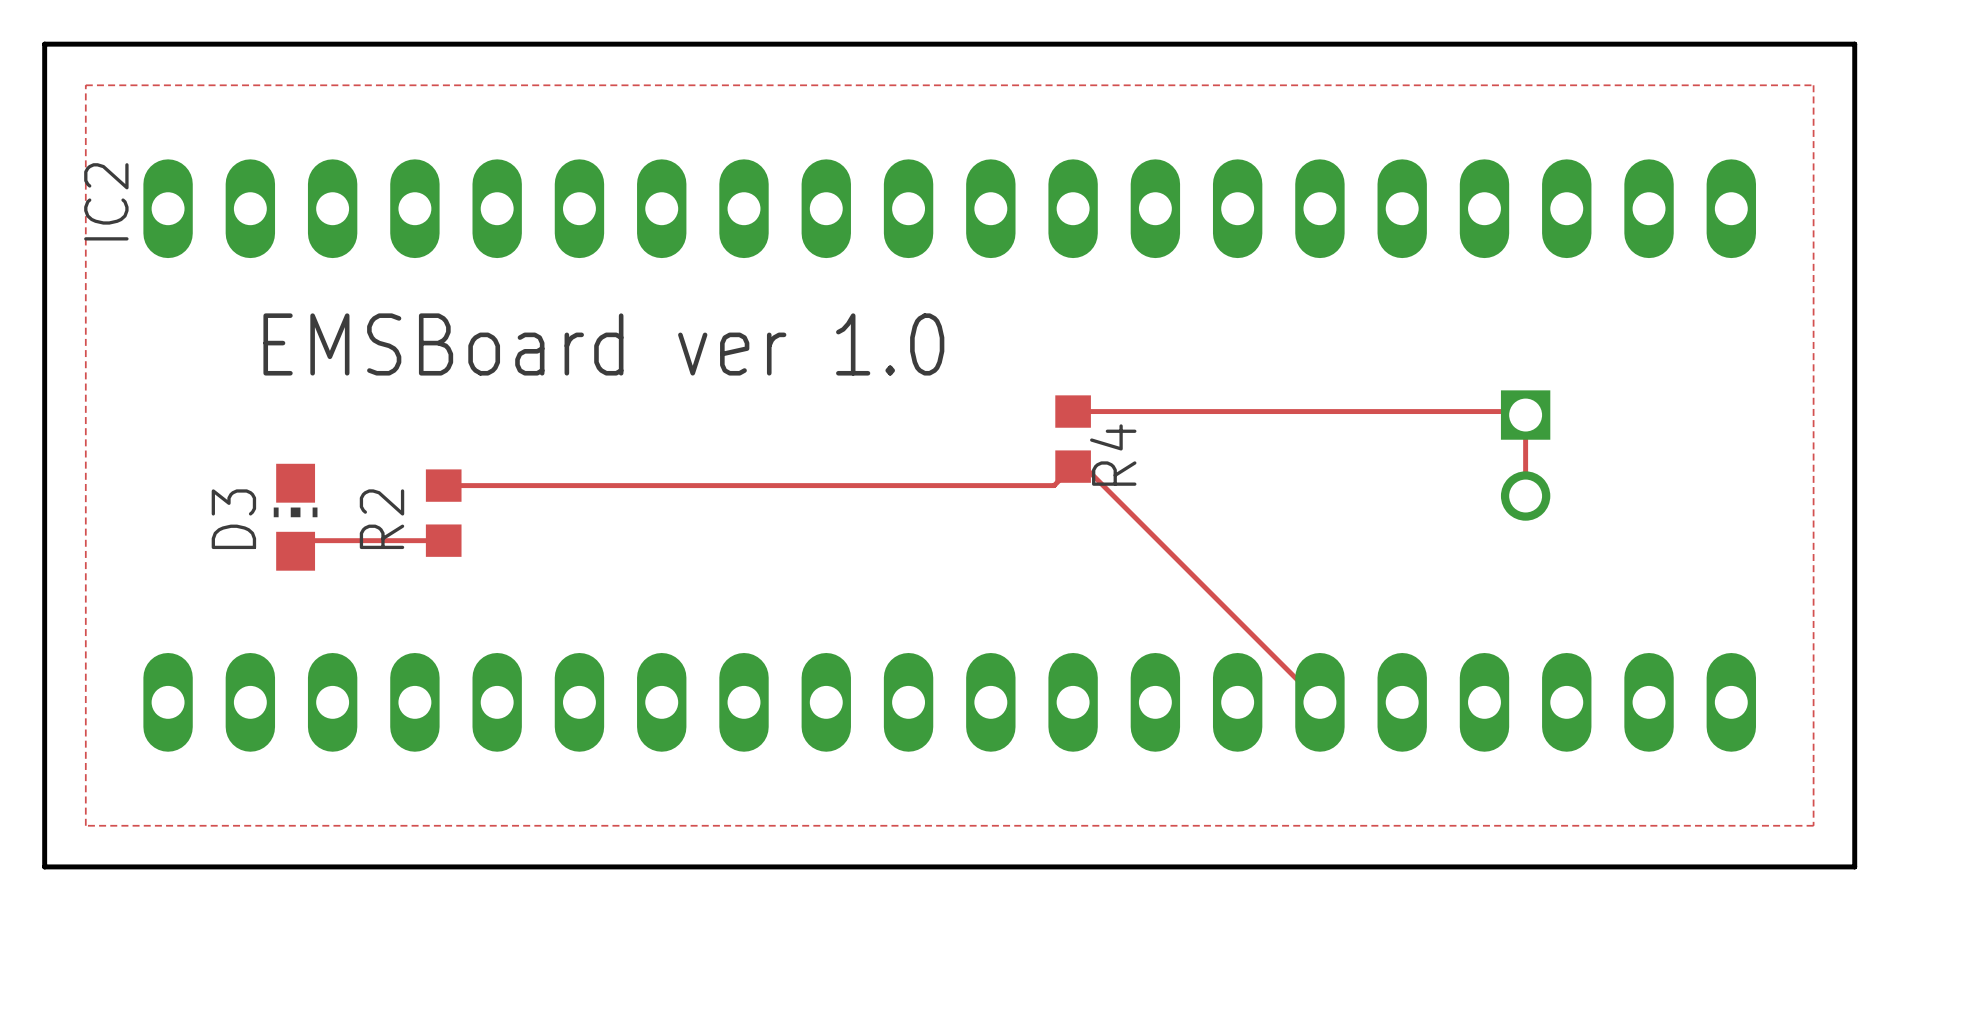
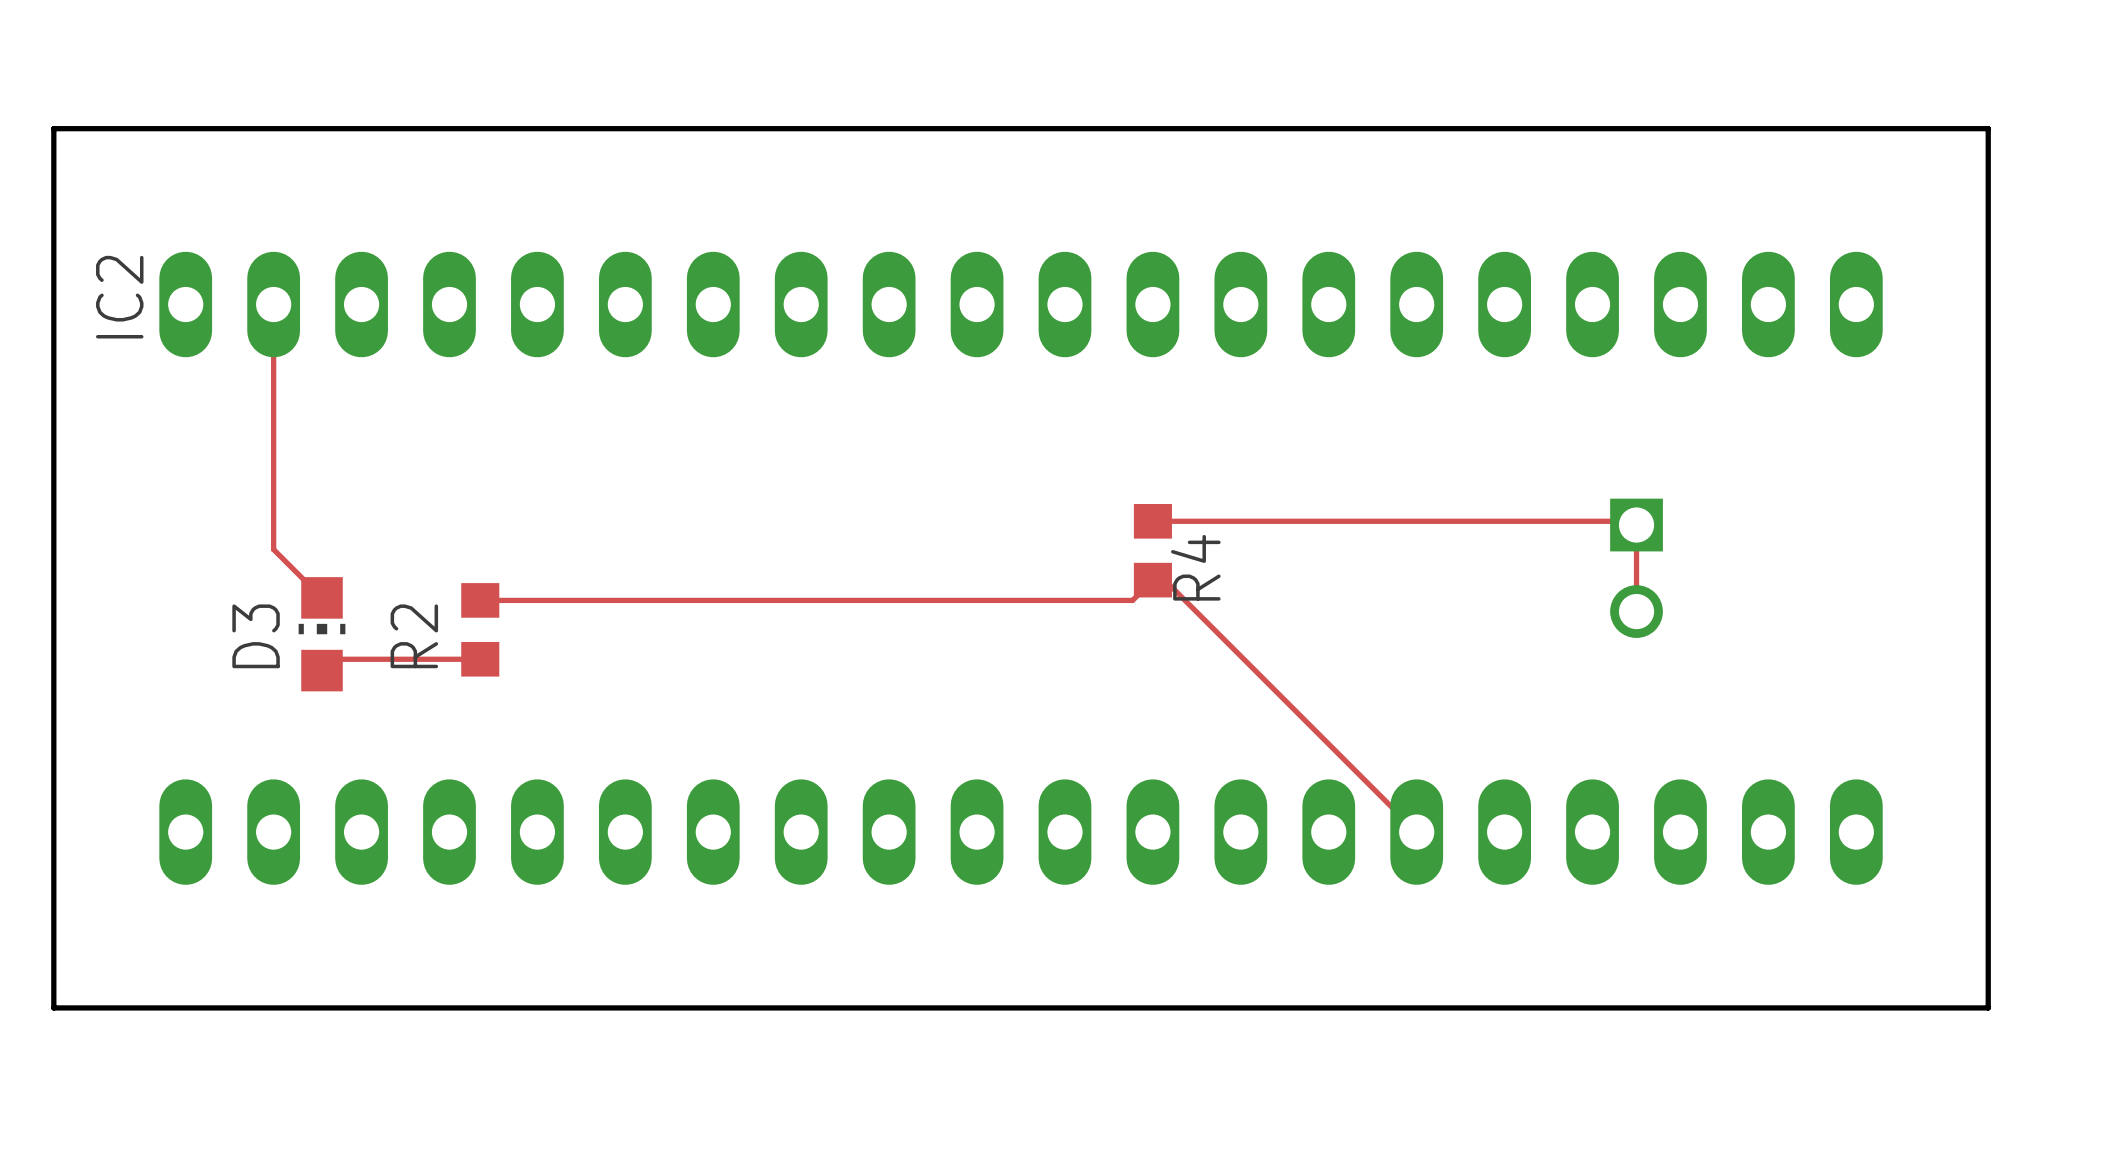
zone outline: (85, 85) (1813, 85) (1813, 825) (85, 825) (85, 85) -> none
track: none -> (273, 304) (273, 549) (322, 597)
text: EMSBoard ver 1.0 (603, 344) -> none

